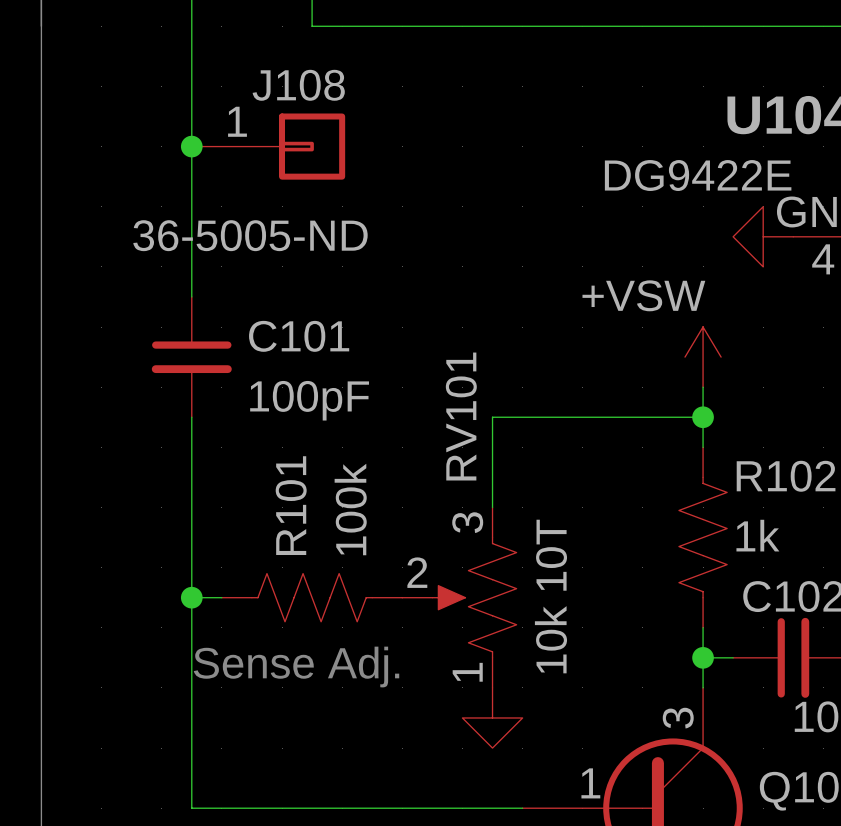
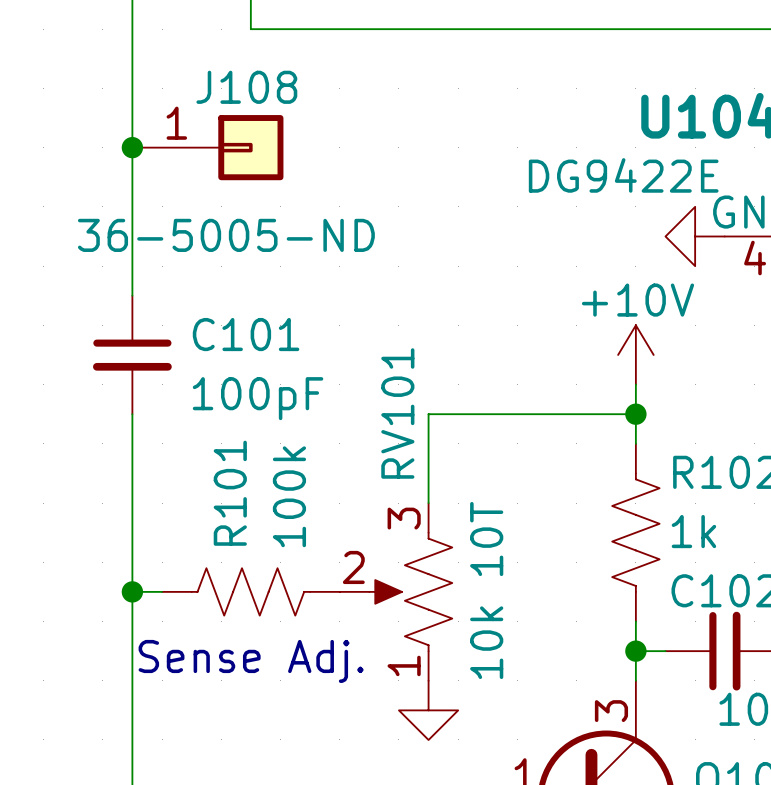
power symbol: +VSW (703, 357) -> +10V (635, 354)

